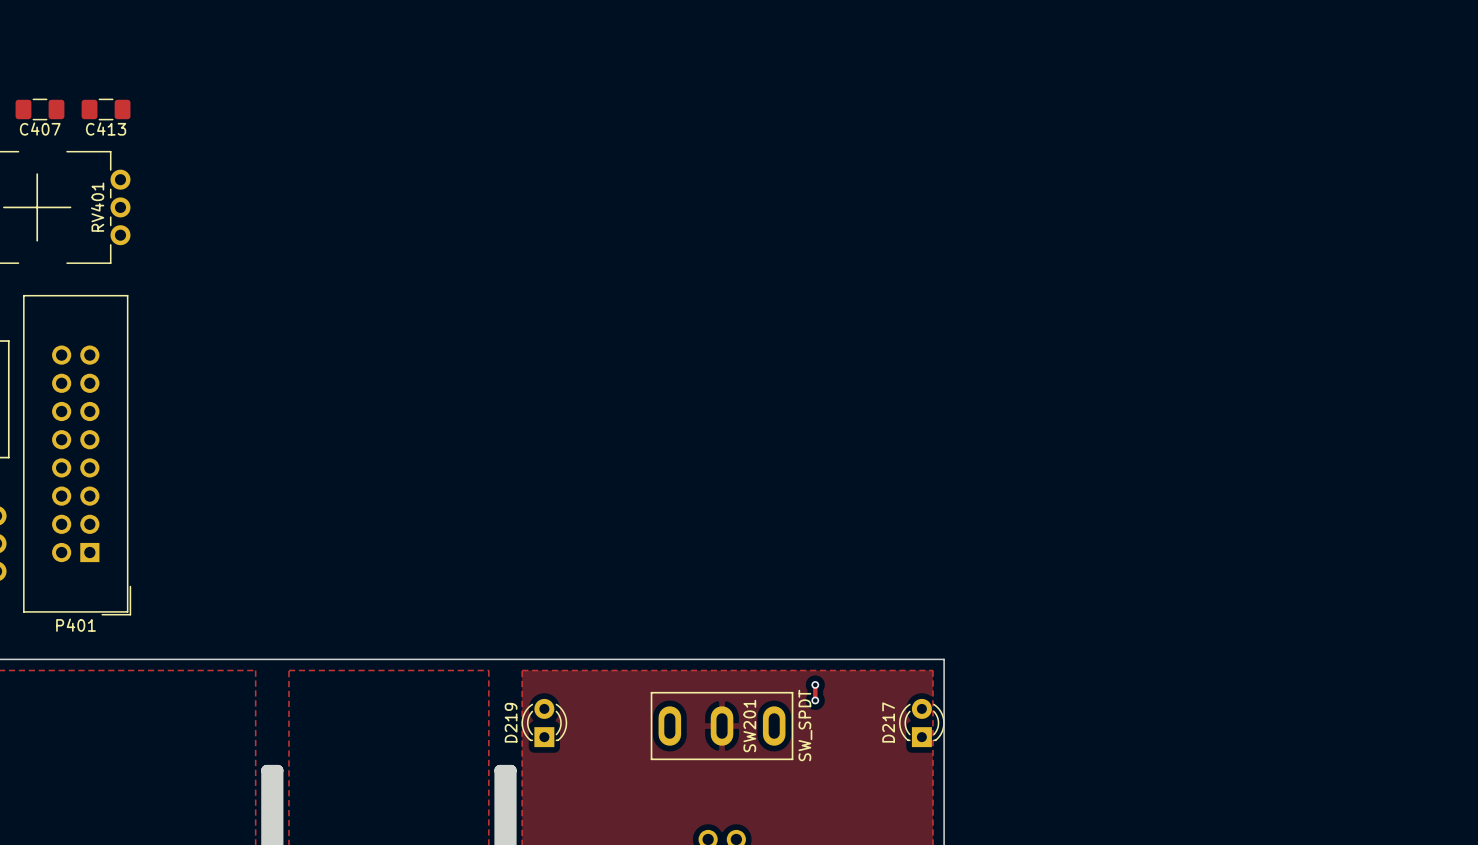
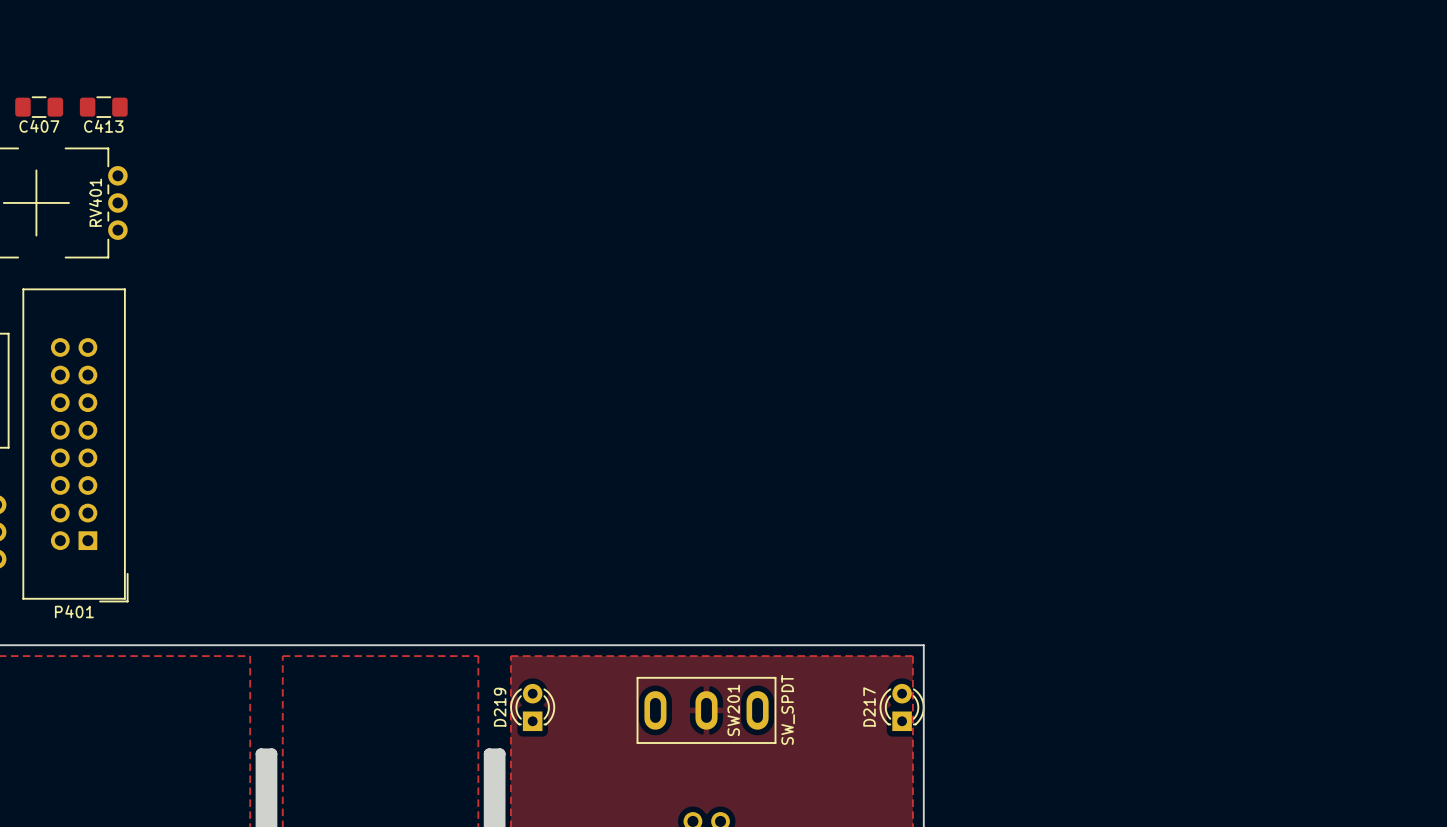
track: (815, 684) (815, 700) -> none
via: (815, 684) -> none
via: (815, 700) -> none

